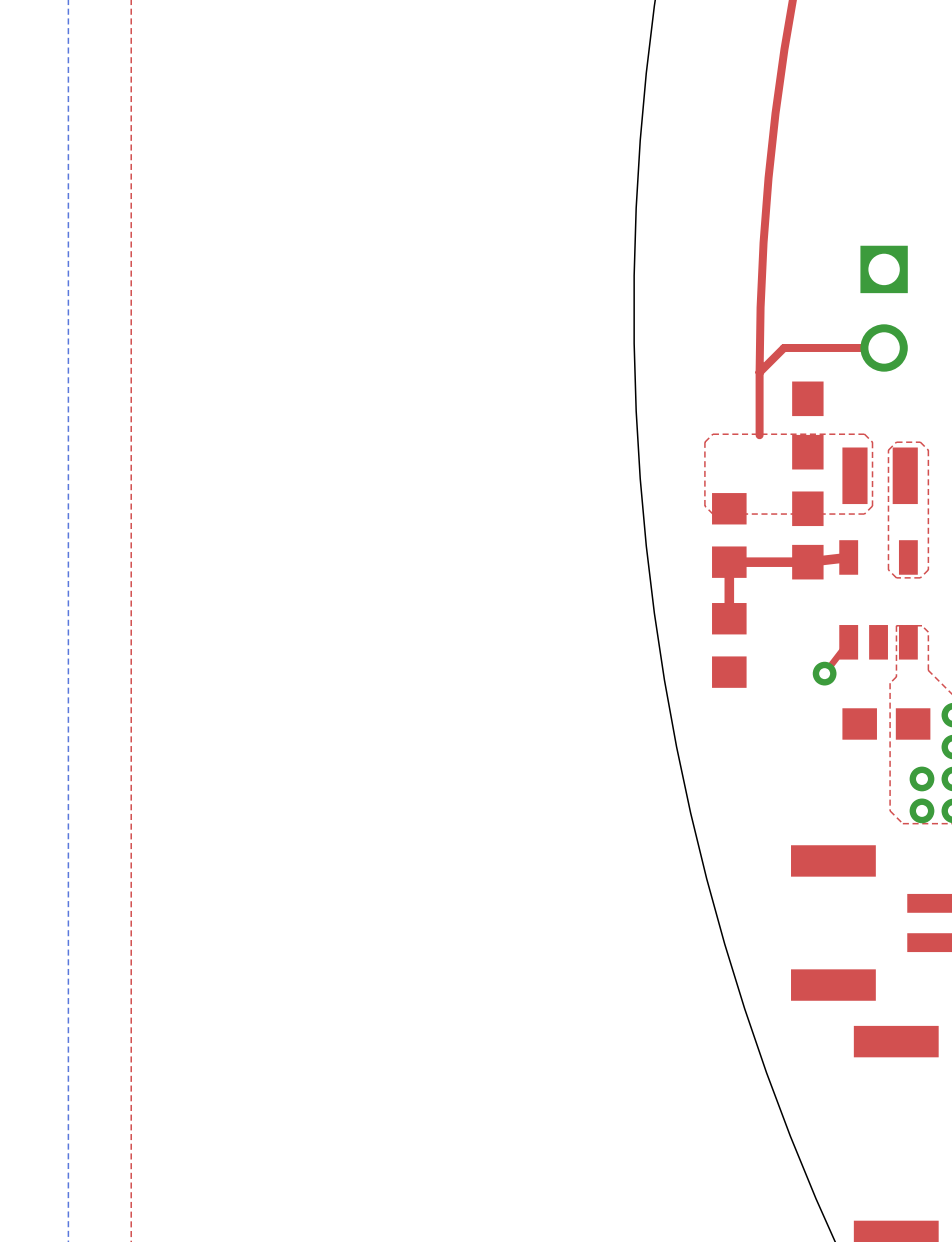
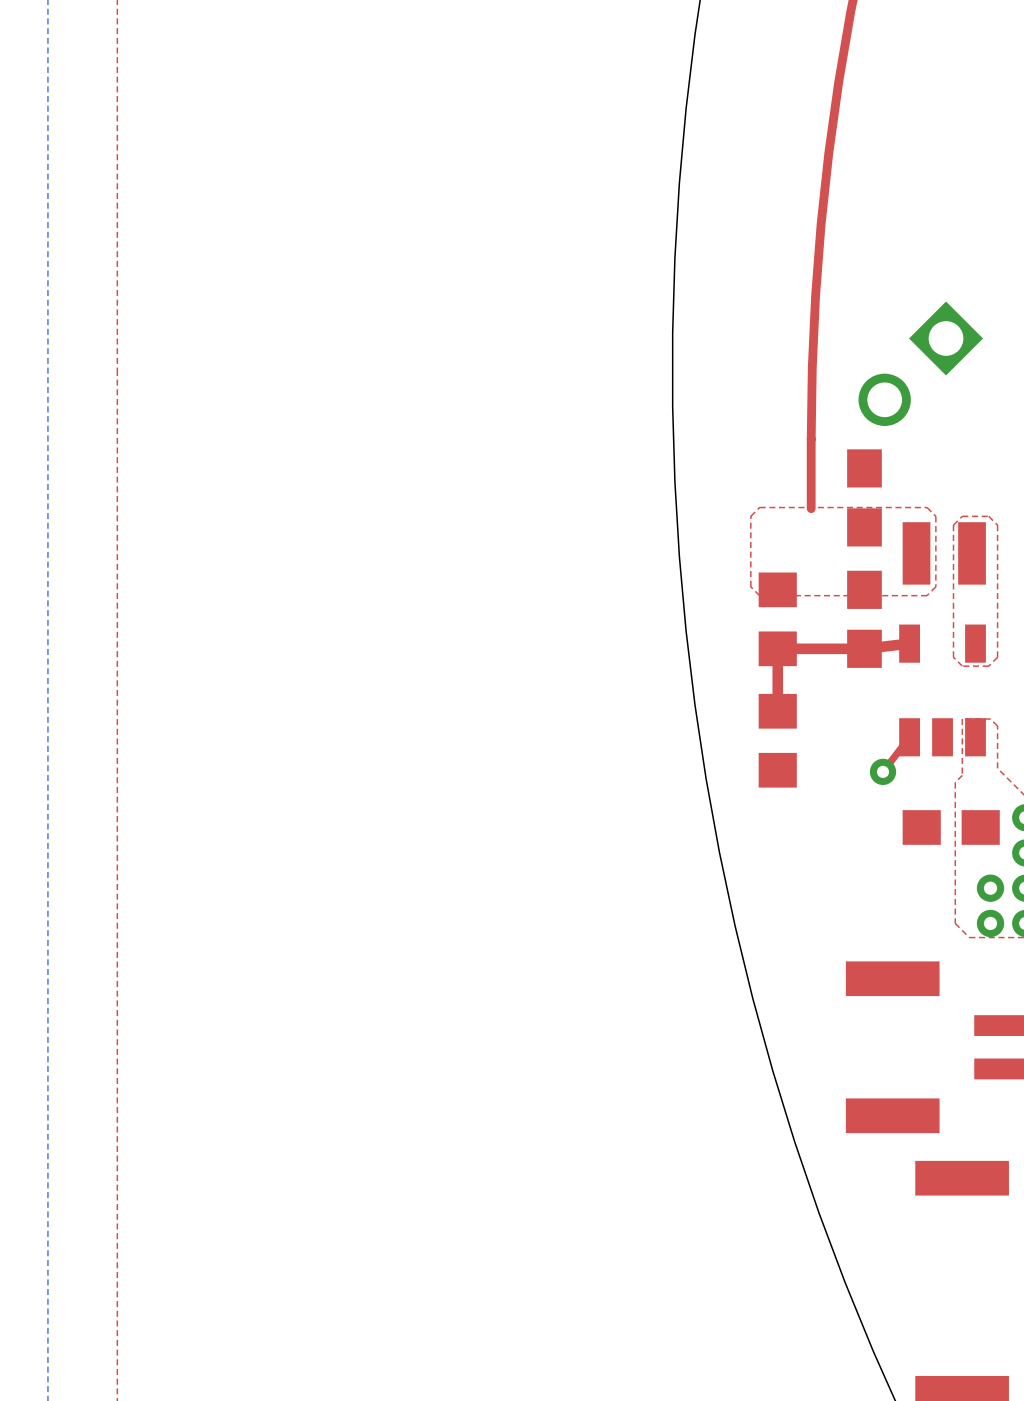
part rotation: 0° (884, 308) -> 45° clockwise (920, 363)
top track: (884, 347) (784, 347) (759, 372) -> none

